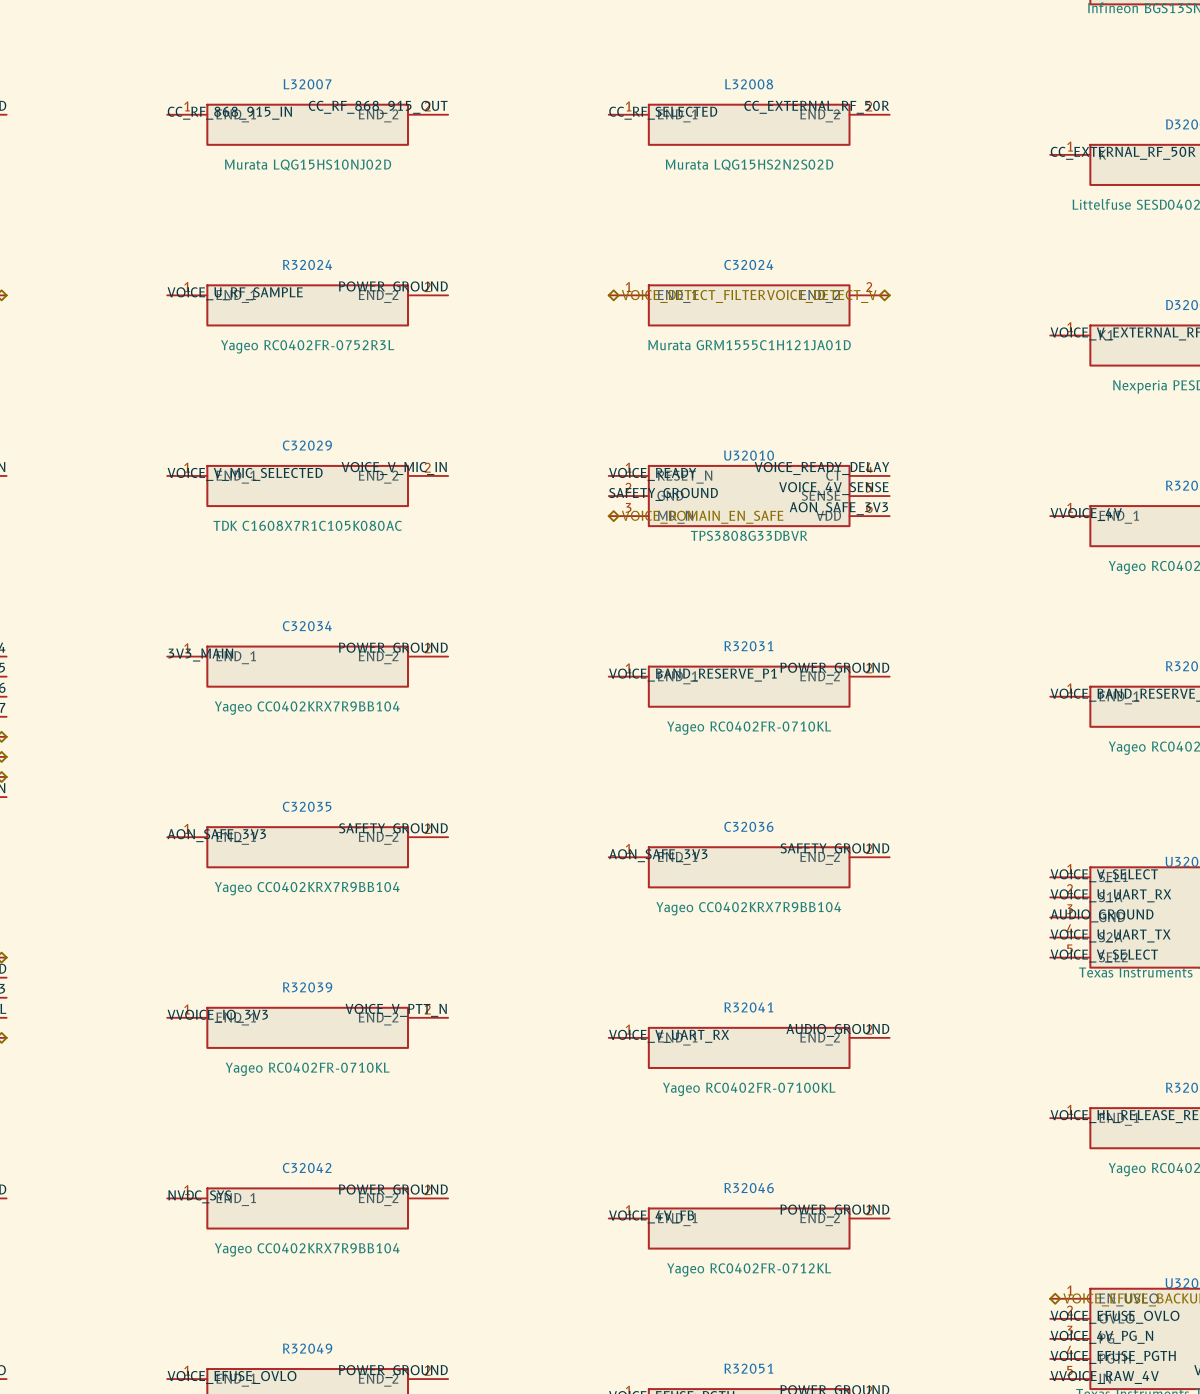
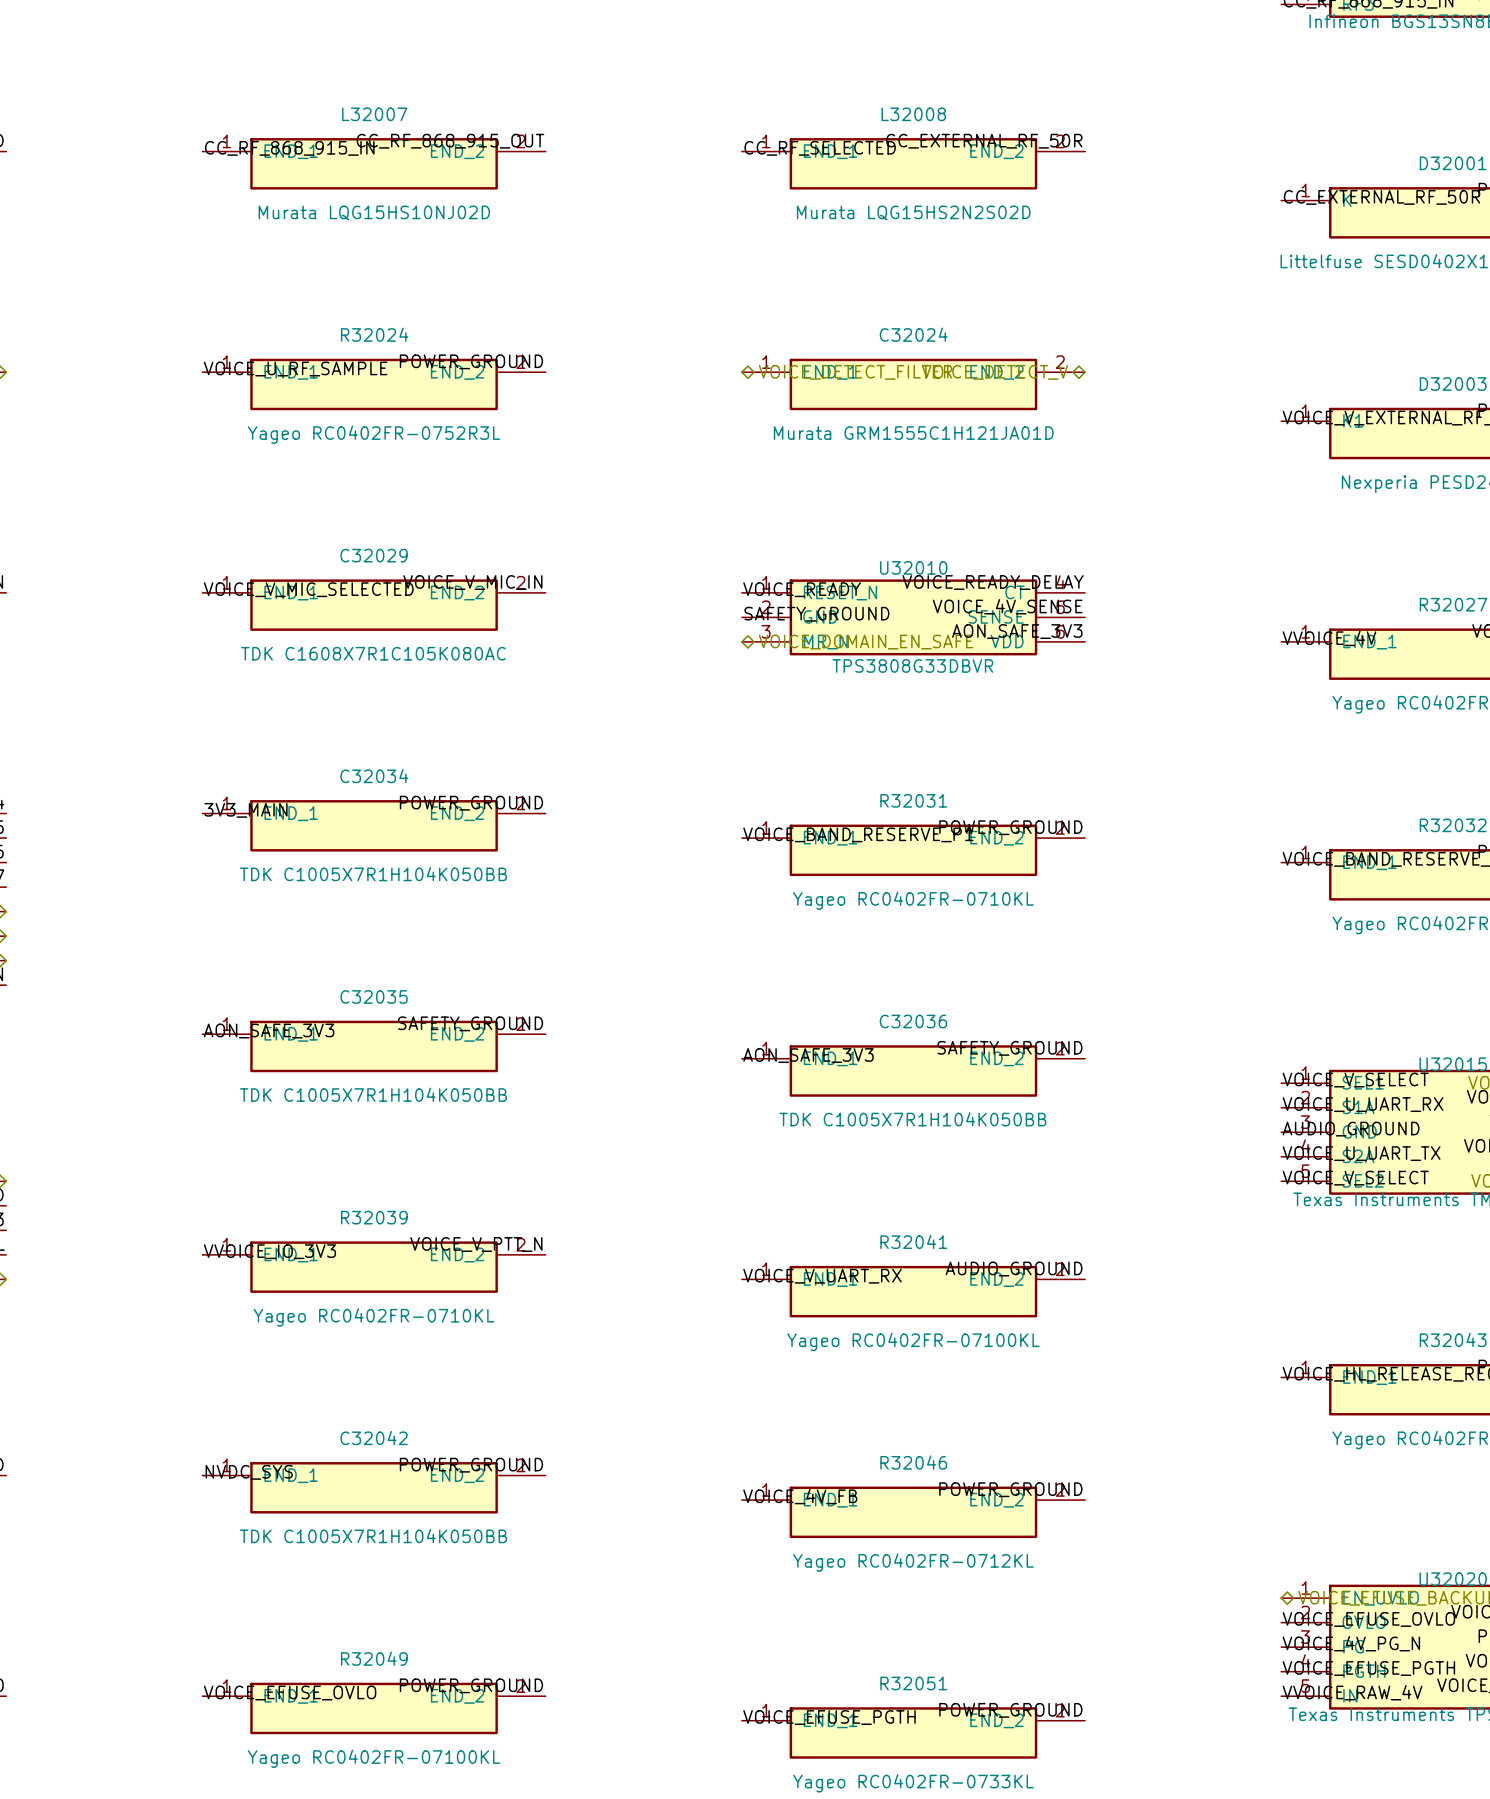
C32034 value: Yageo CC0402KRX7R9BB104 (307, 708) -> TDK C1005X7R1H104K050BB (373, 874)
C32035 value: Yageo CC0402KRX7R9BB104 (307, 888) -> TDK C1005X7R1H104K050BB (373, 1094)
C32036 value: Yageo CC0402KRX7R9BB104 (748, 908) -> TDK C1005X7R1H104K050BB (912, 1119)
C32042 value: Yageo CC0402KRX7R9BB104 (307, 1249) -> TDK C1005X7R1H104K050BB (373, 1536)

